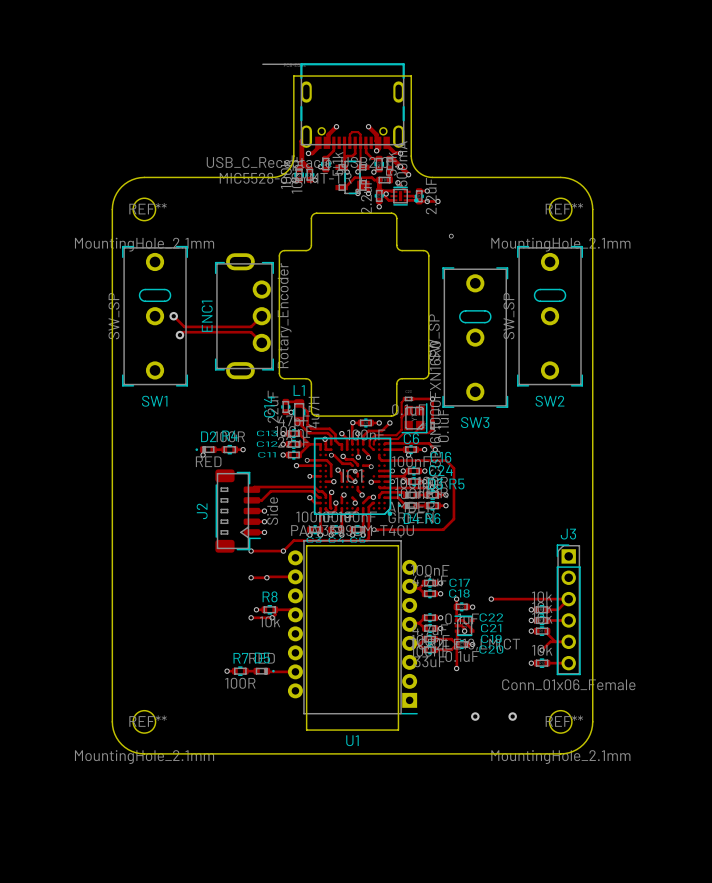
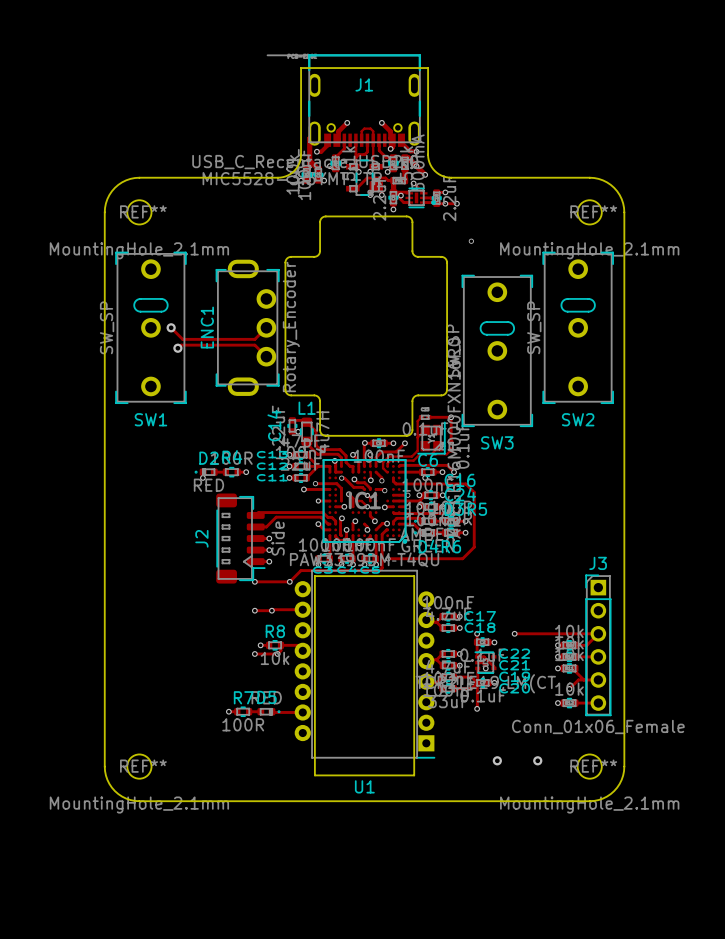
J1 name: none -> J1 (364, 84)

